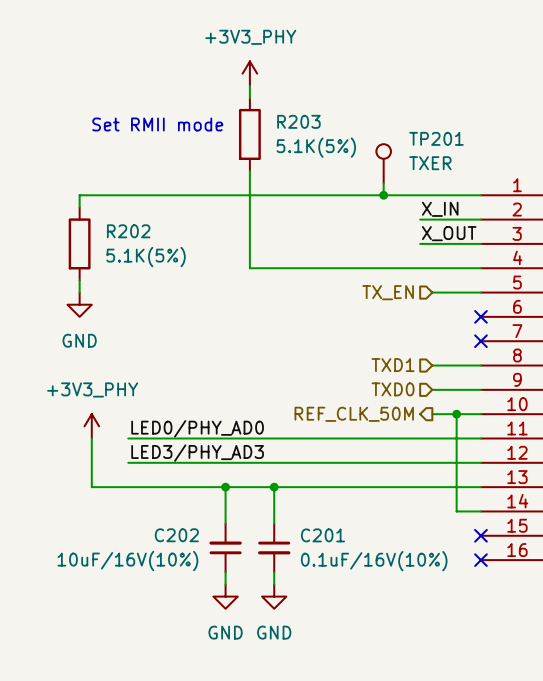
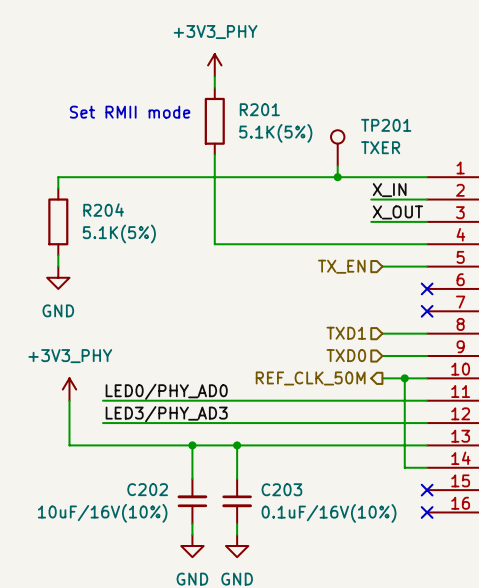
R203 name: R203 (298, 121) -> R201 (259, 109)
R202 name: R202 (128, 231) -> R204 (103, 210)
C201 name: C201 (322, 535) -> C203 (281, 489)

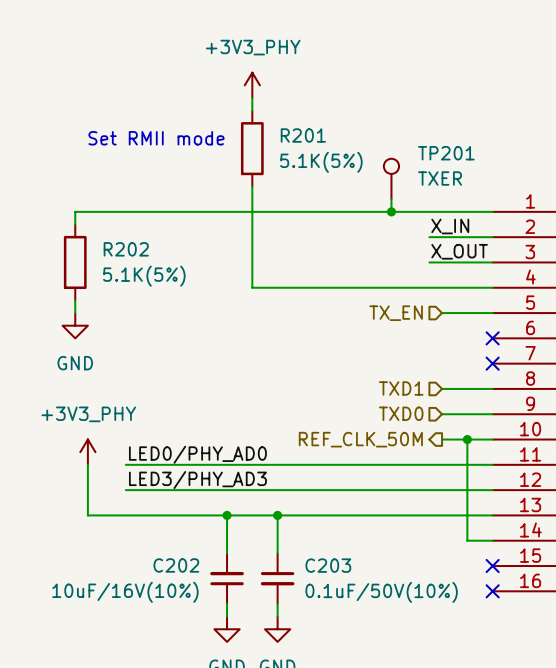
R204 name: R204 (103, 210) -> R202 (126, 249)
C203 value: 0.1uF/16V(10%) (329, 513) -> 0.1uF/50V(10%) (381, 592)

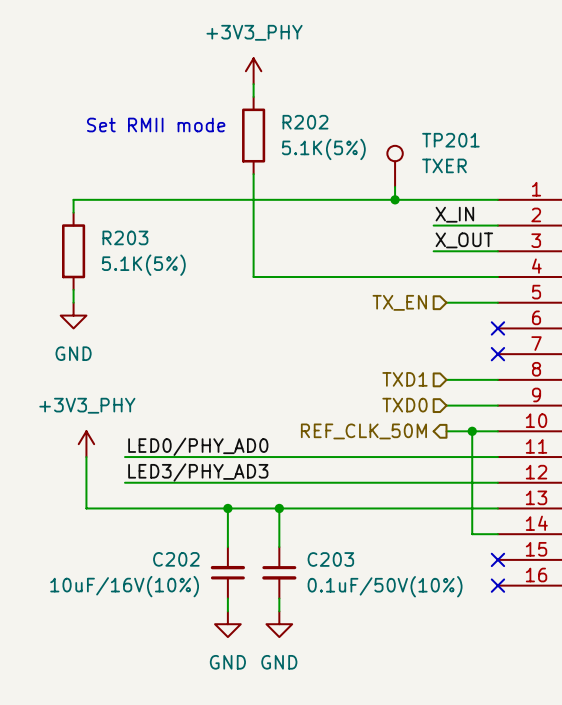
R201 name: R201 (303, 135) -> R202 (305, 122)
R202 name: R202 (126, 249) -> R203 (125, 237)

